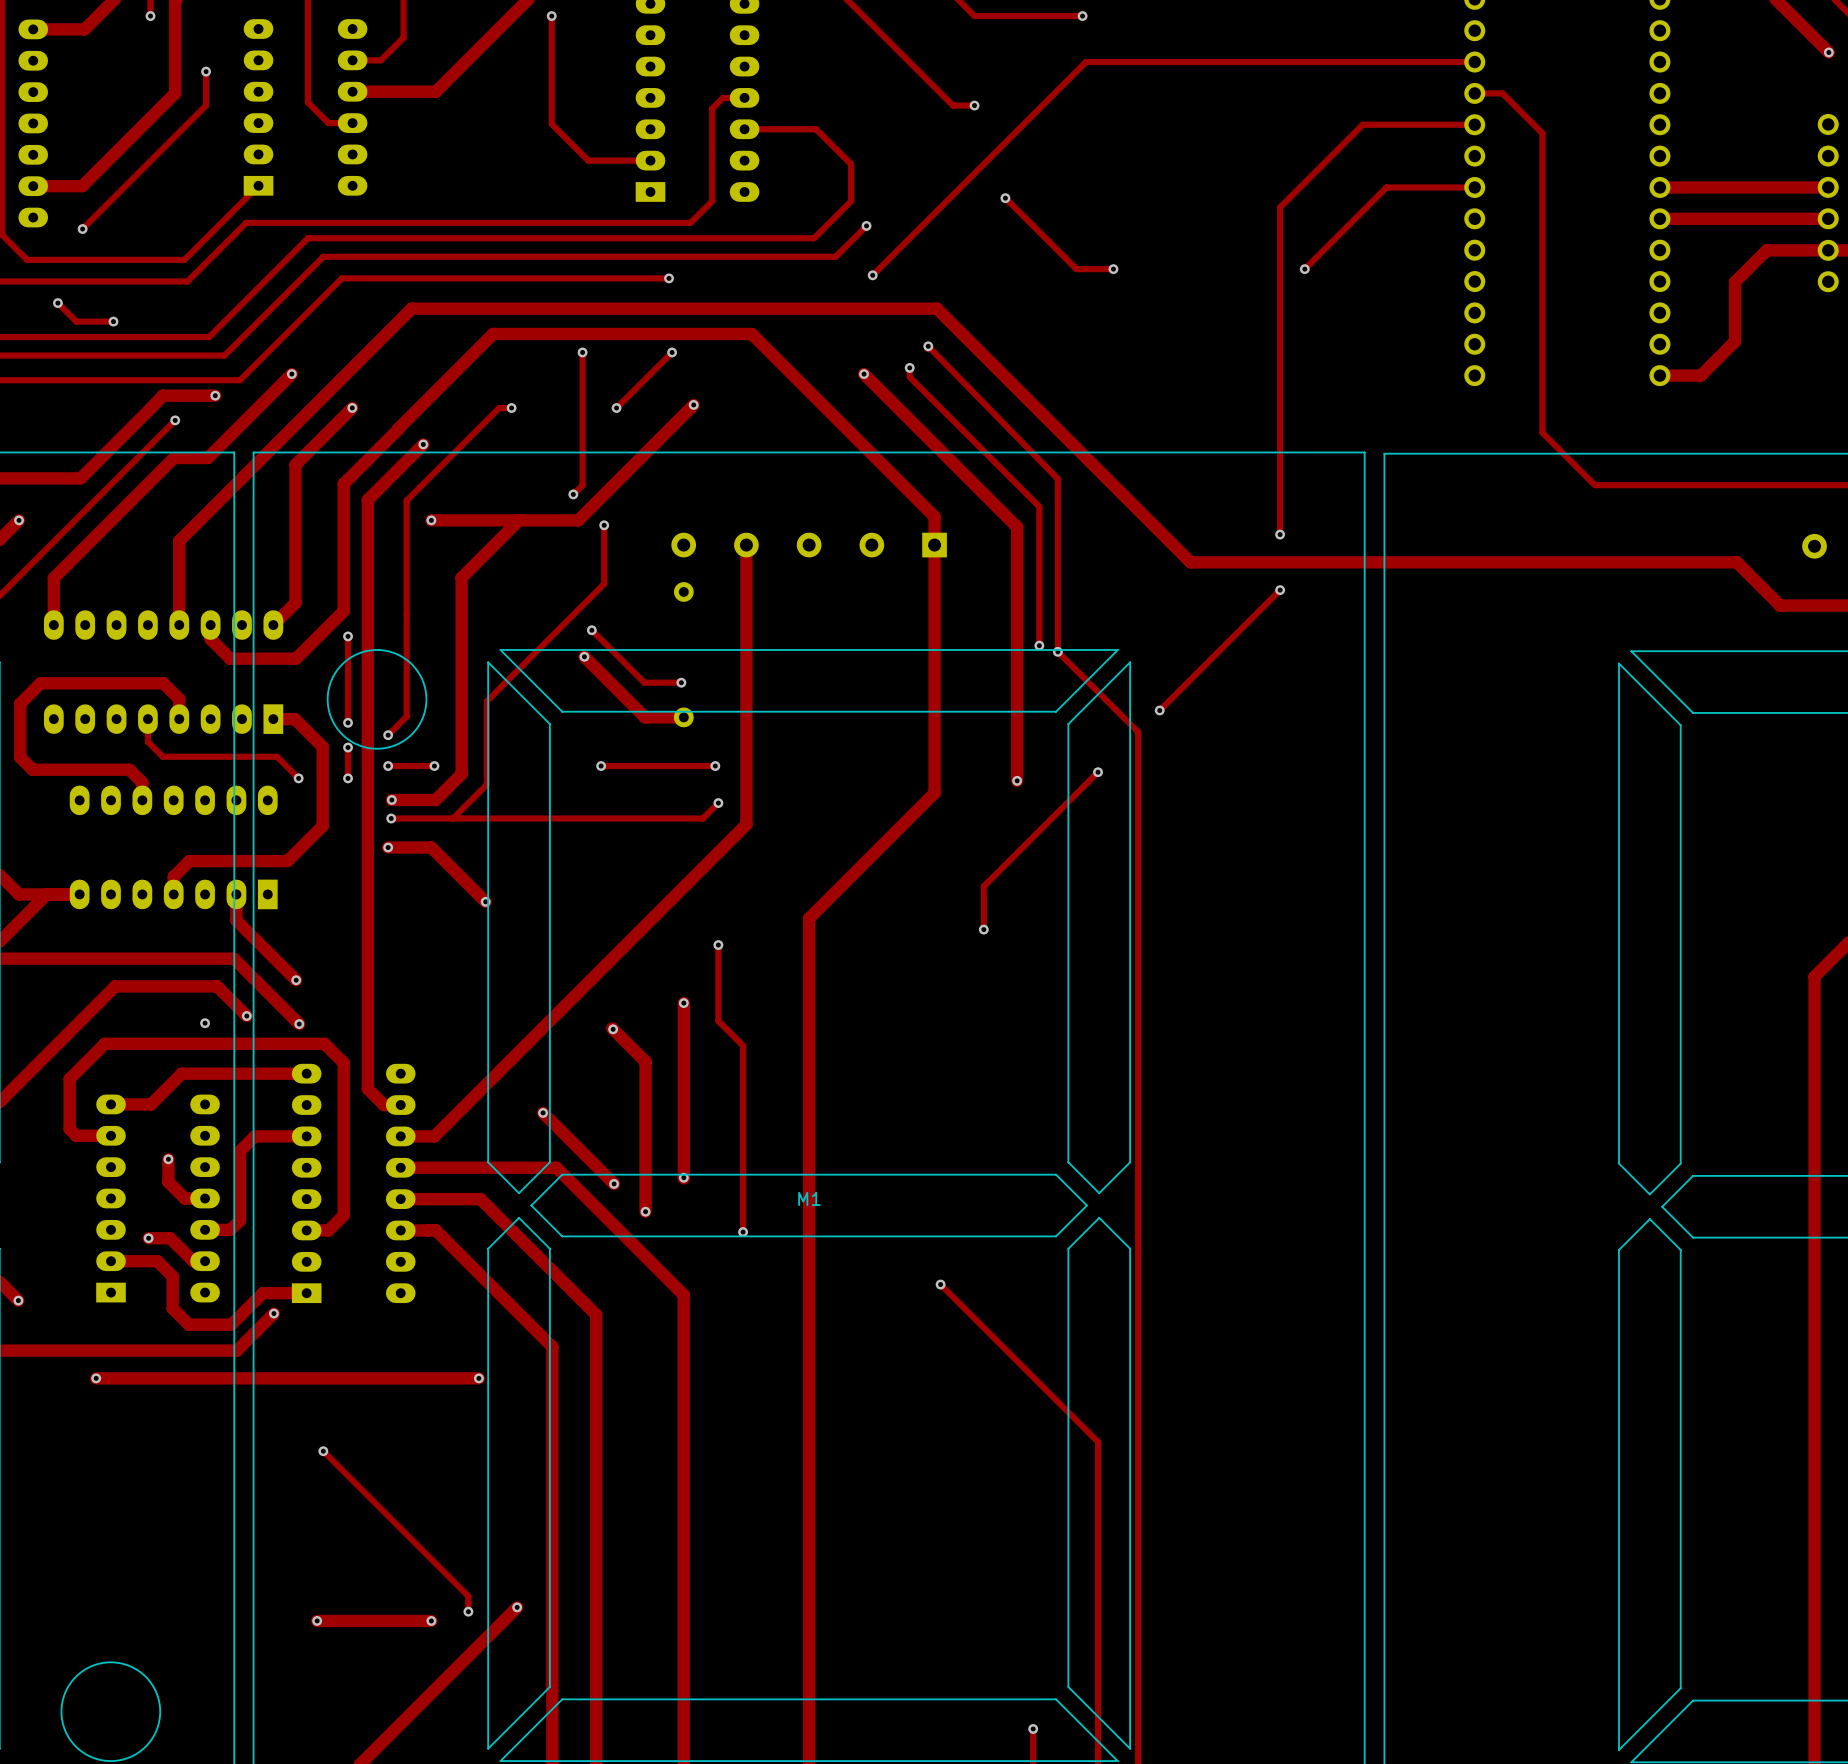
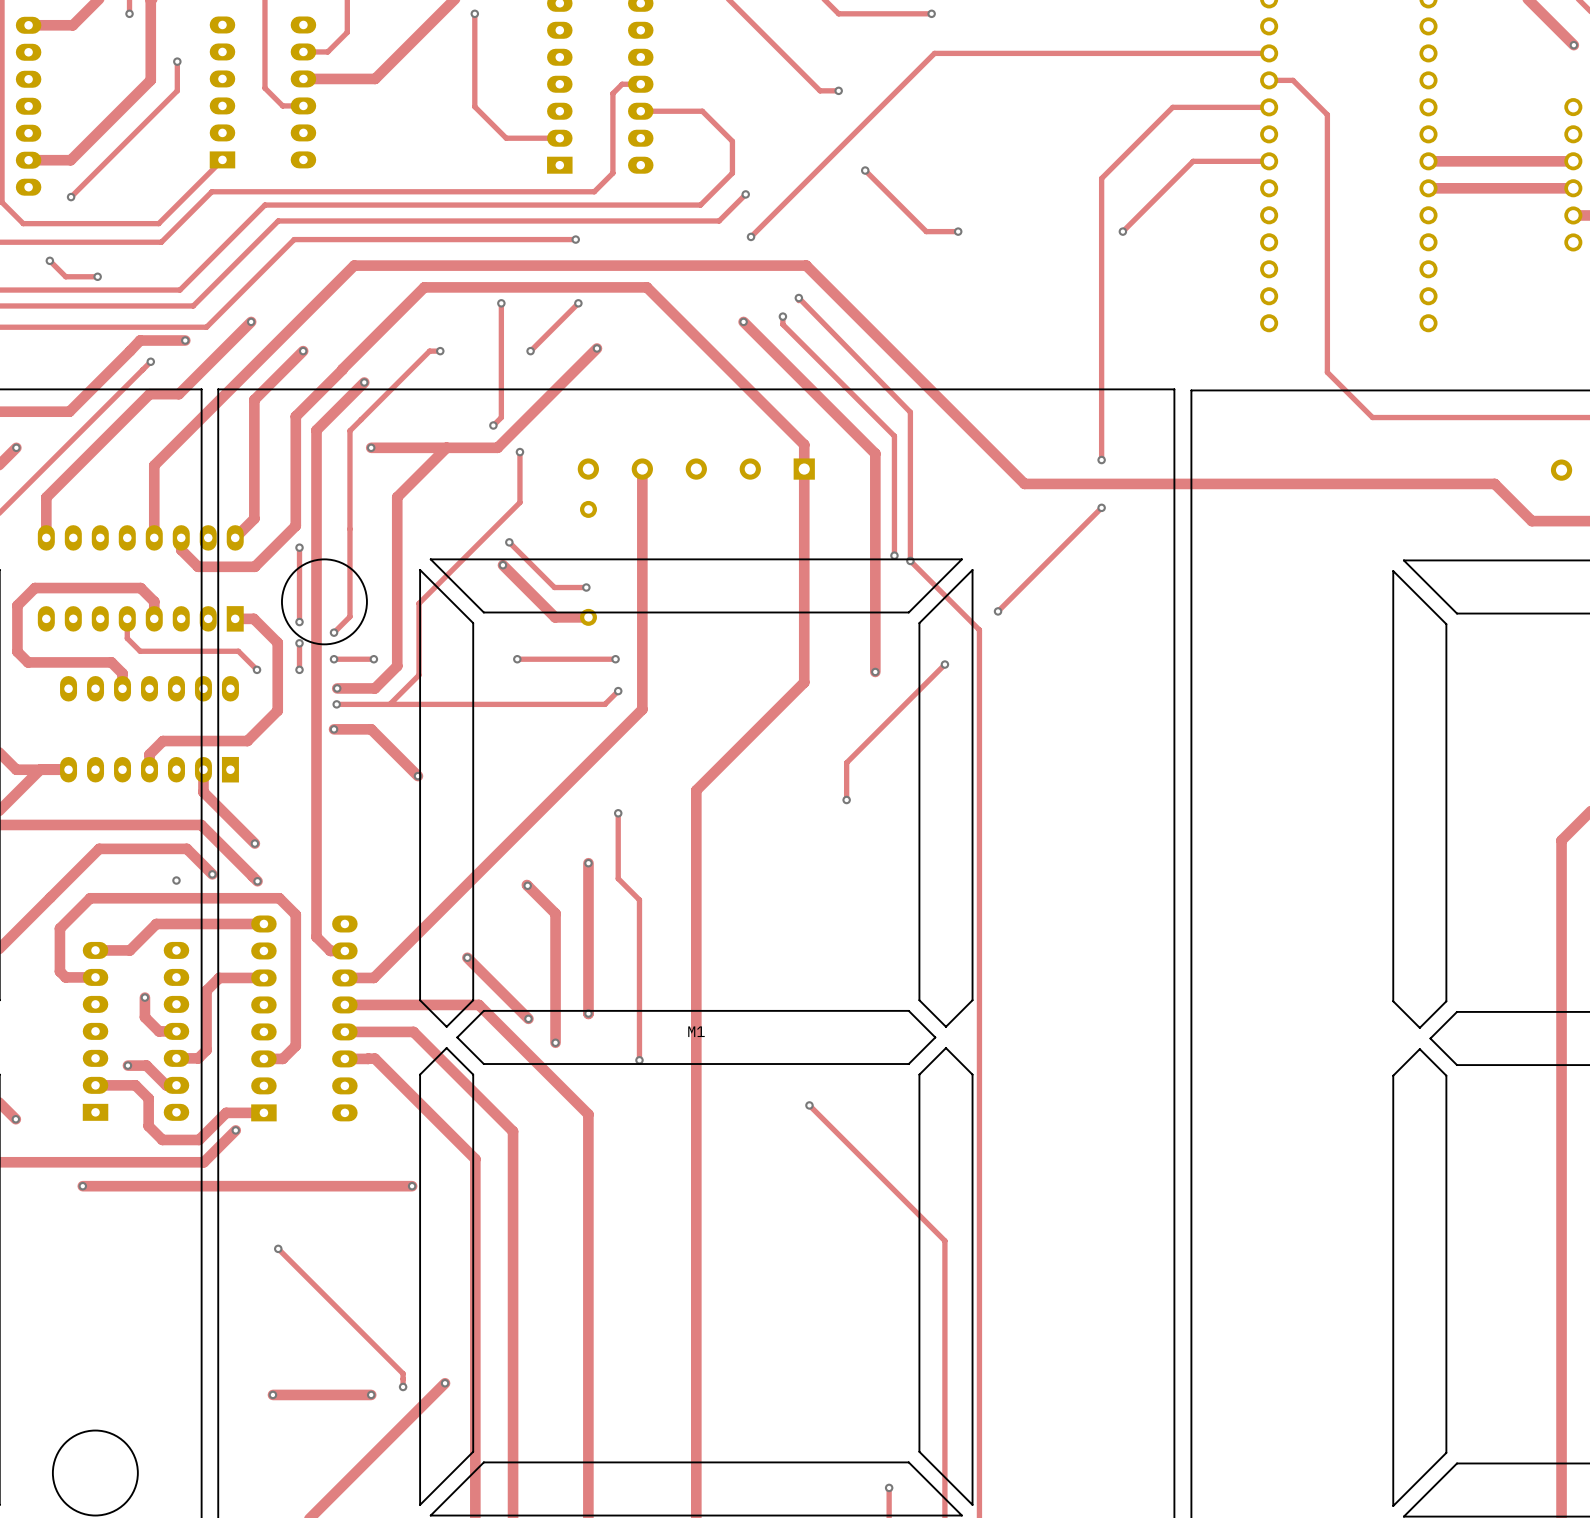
track: (1828, 250) (1766, 250) (1735, 282) (1735, 341) (1700, 375) (1659, 375) -> none

